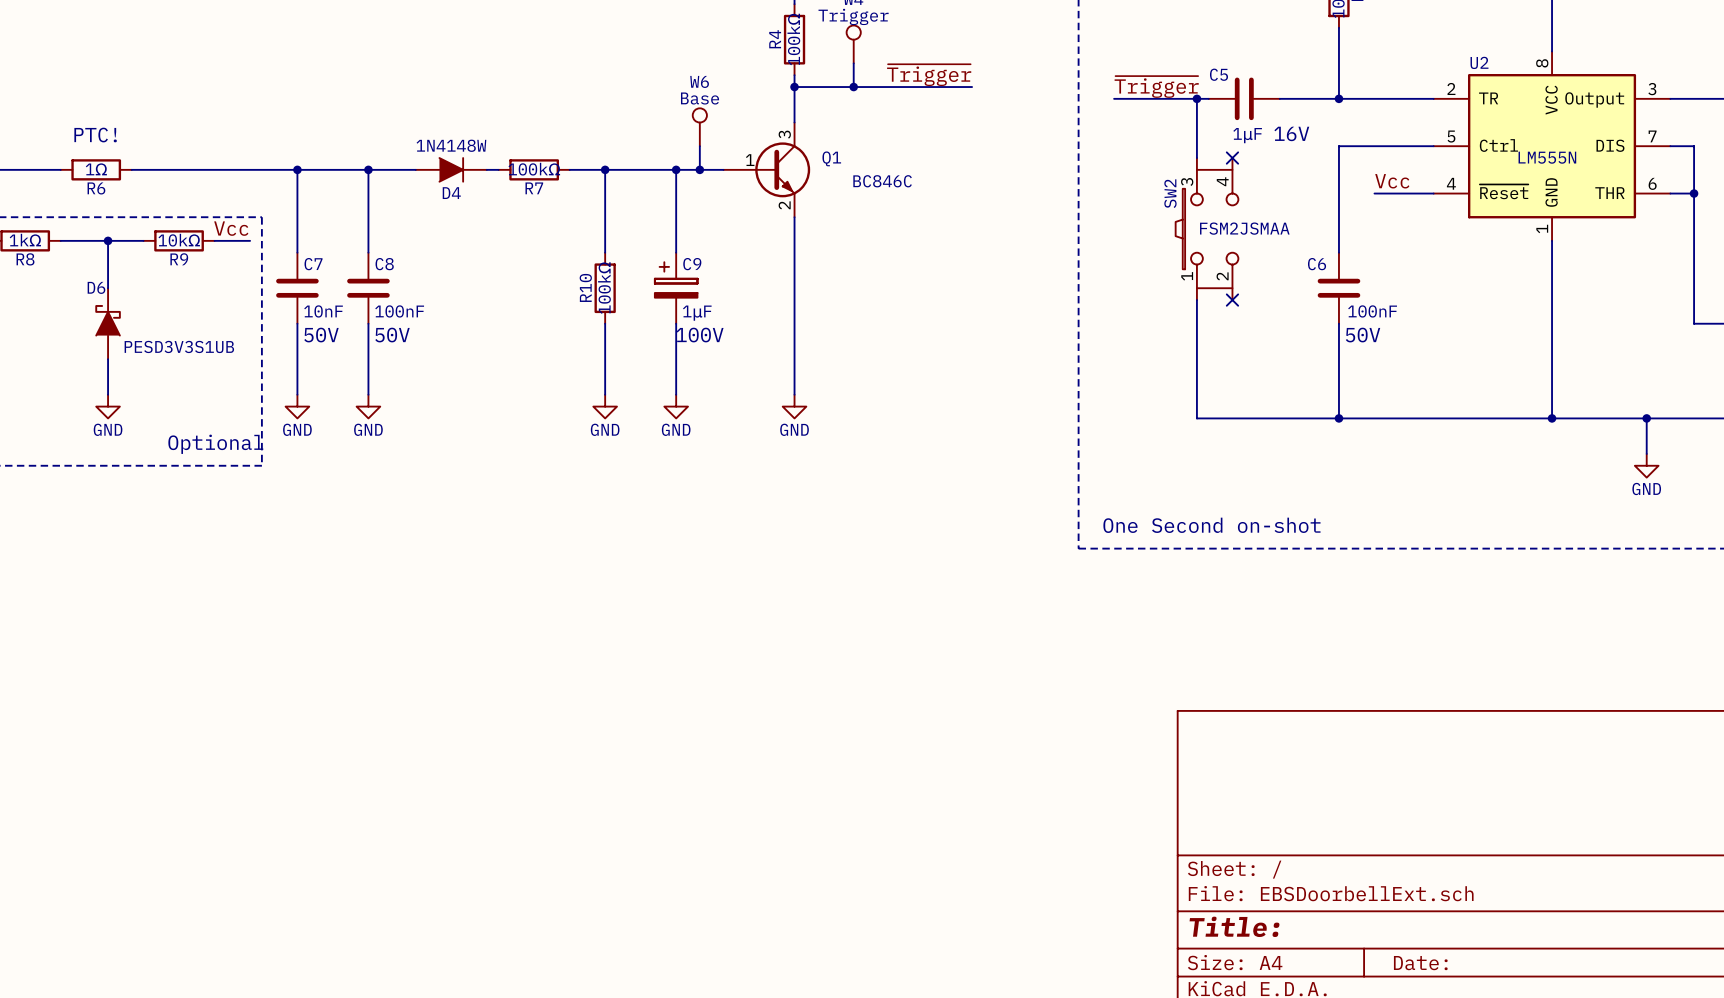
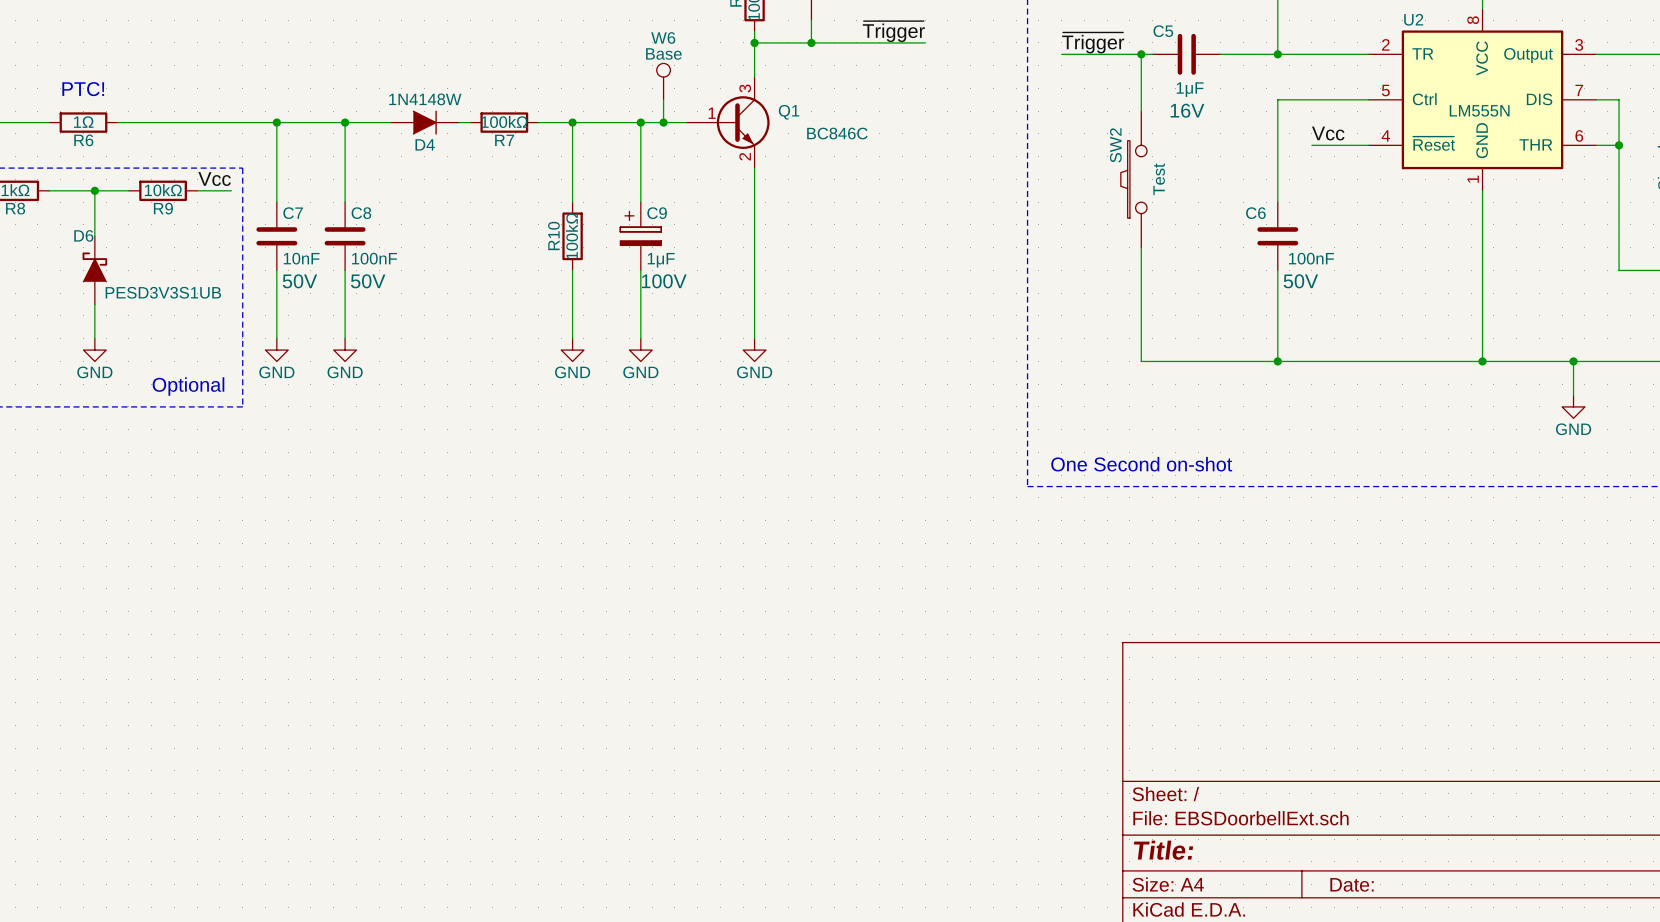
C5 text position: 16V (1291, 133) -> 16V (1187, 110)
SW2 symbol: [1175, 158, 1239, 301] -> [1120, 111, 1147, 248]
no-connect mark: (1232, 158) -> none
SW2 value: FSM2JSMAA (1244, 228) -> Test (1159, 179)
no-connect mark: (1232, 300) -> none

